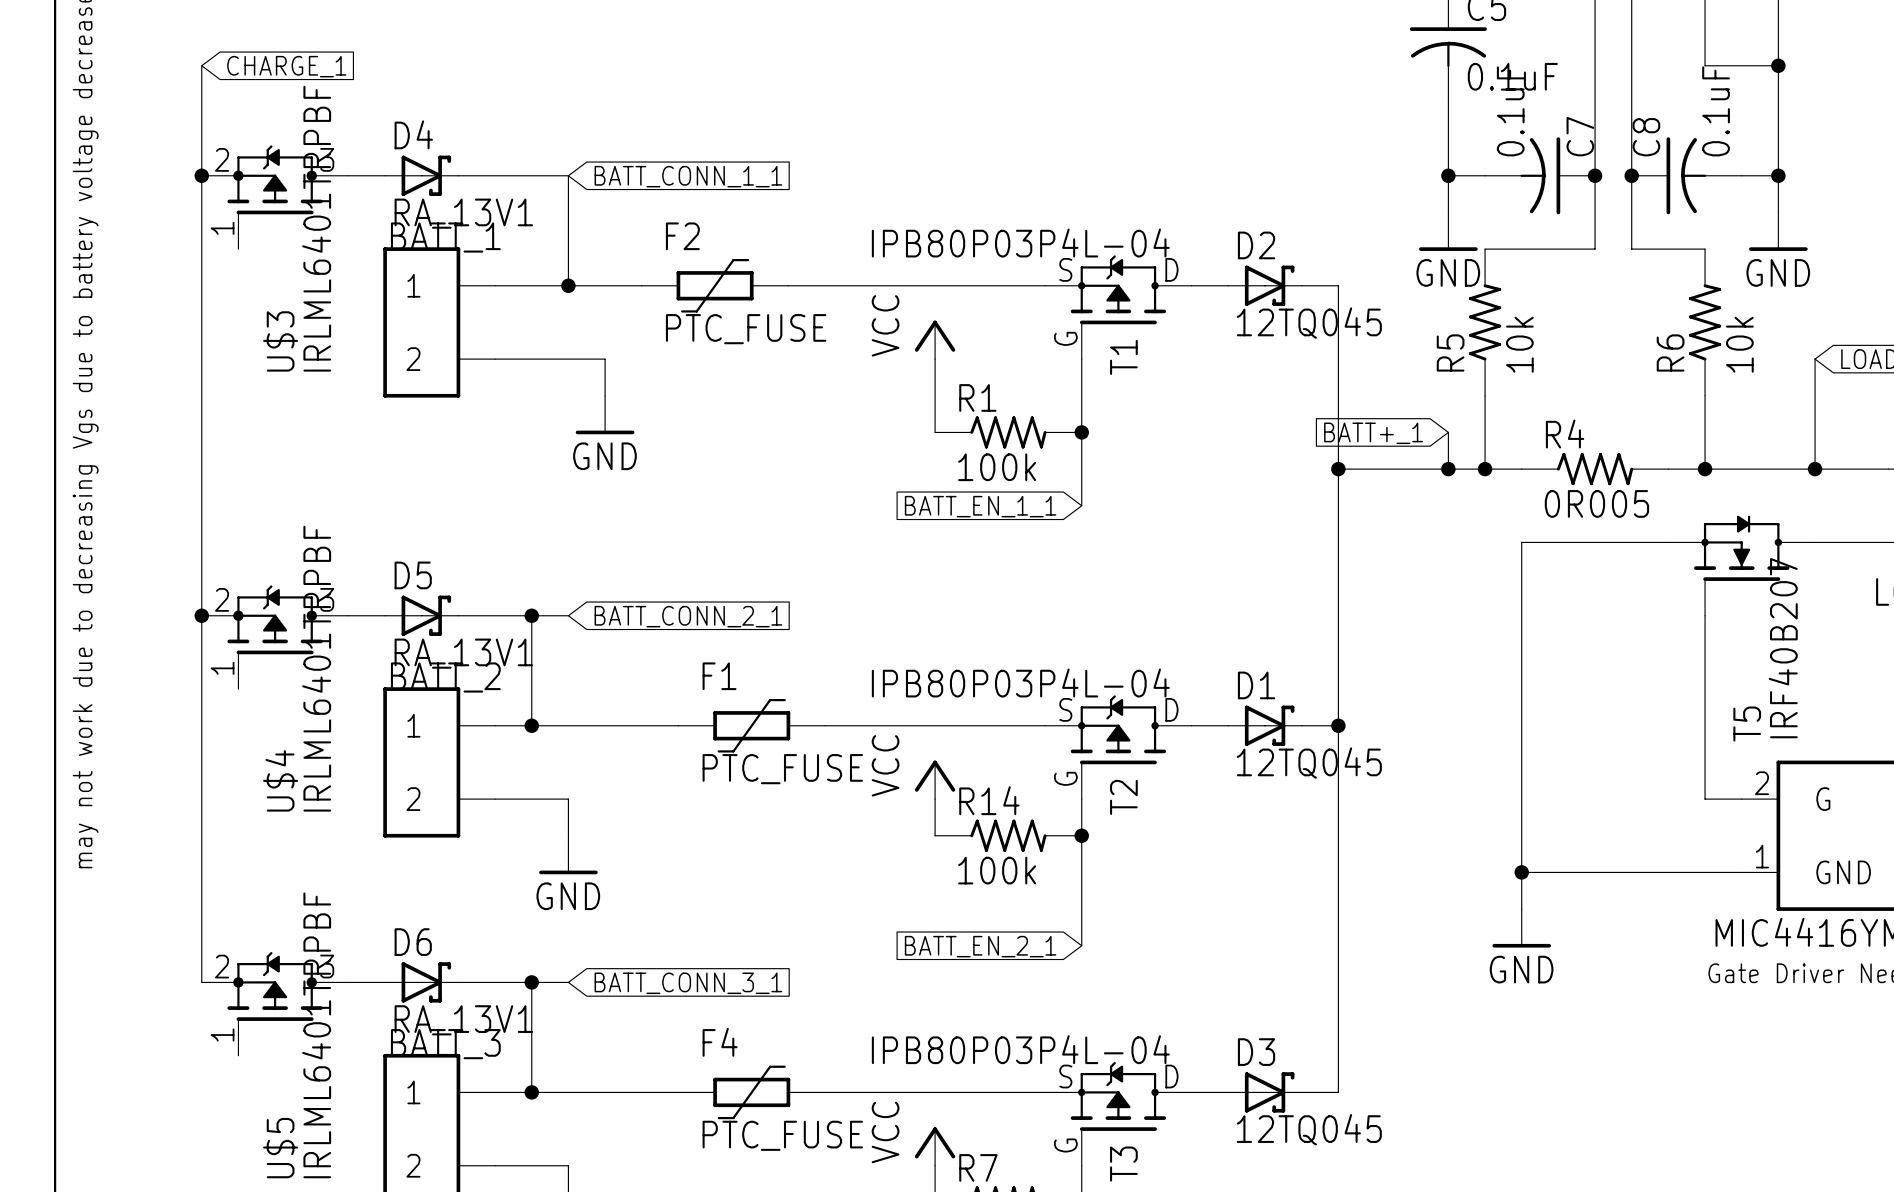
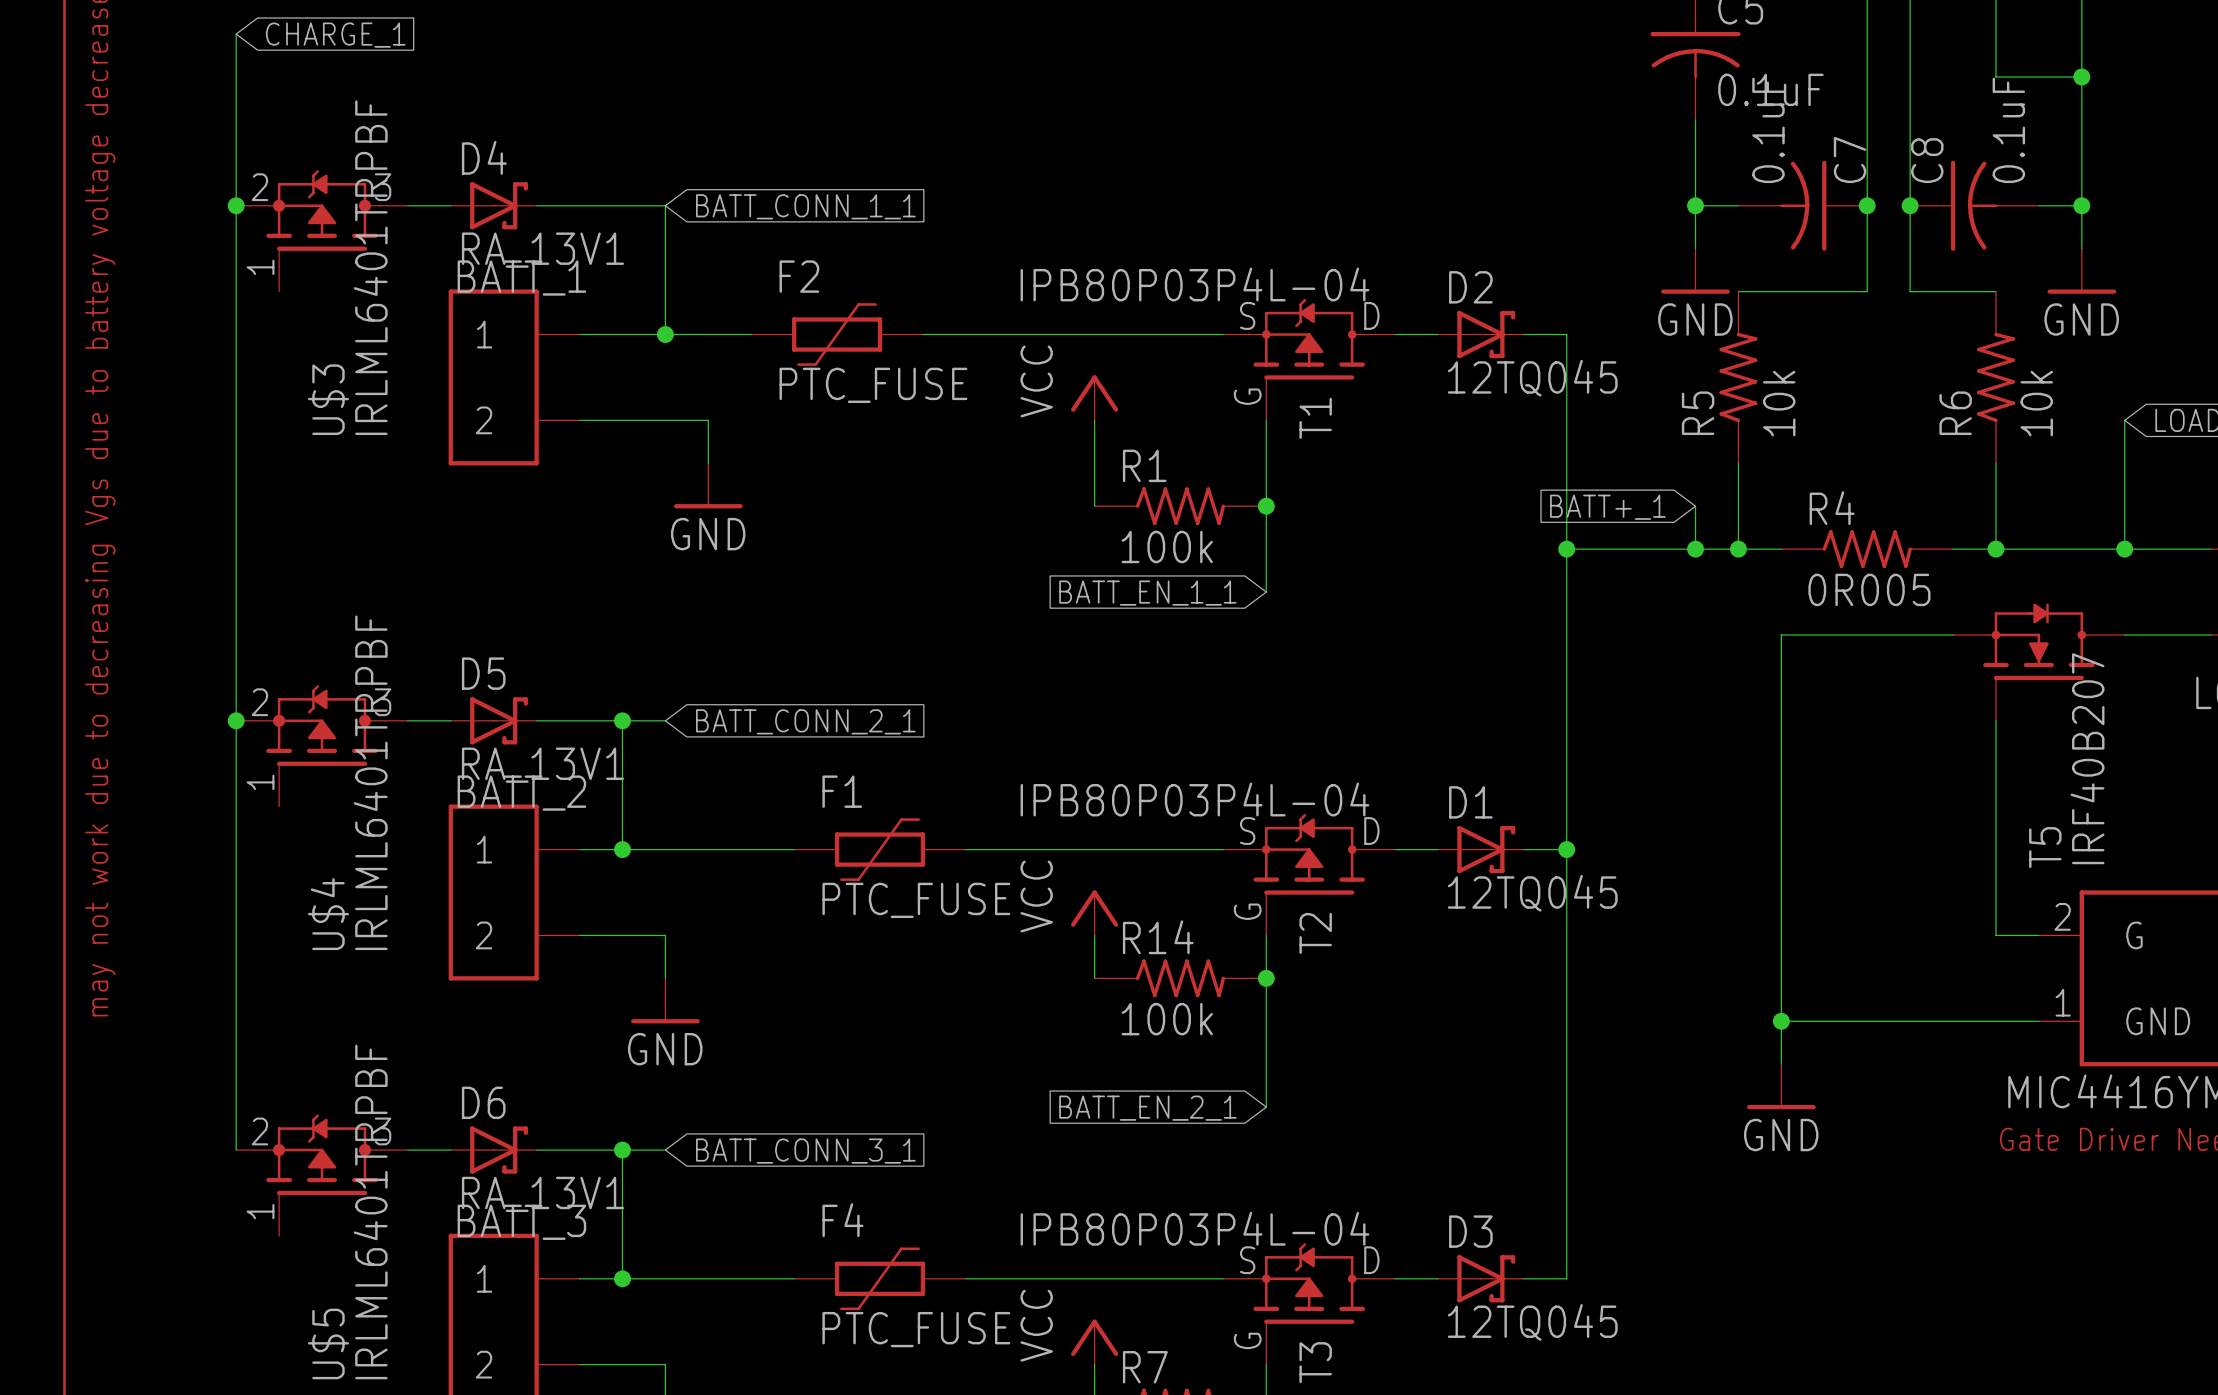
wire: none -> (236, 34) (236, 77)
global label position: CHARGE_1 (286, 66) -> CHARGE_1 (335, 35)

